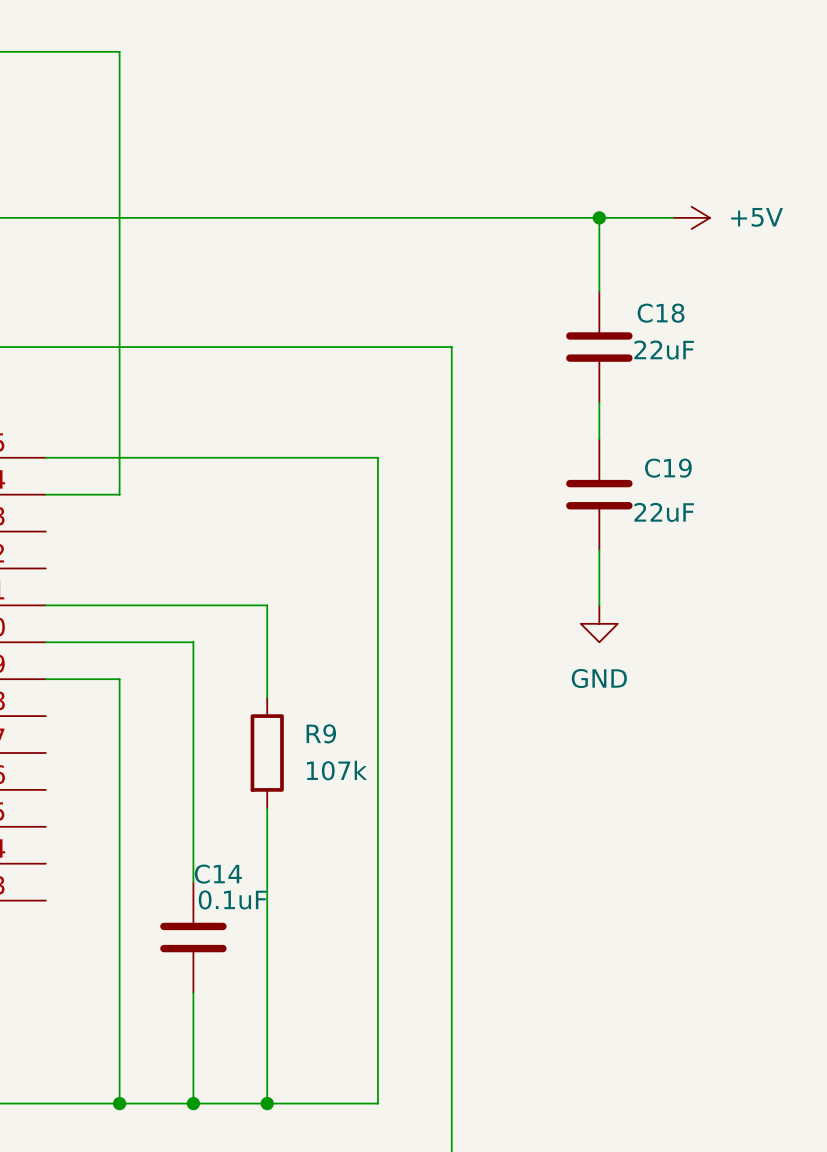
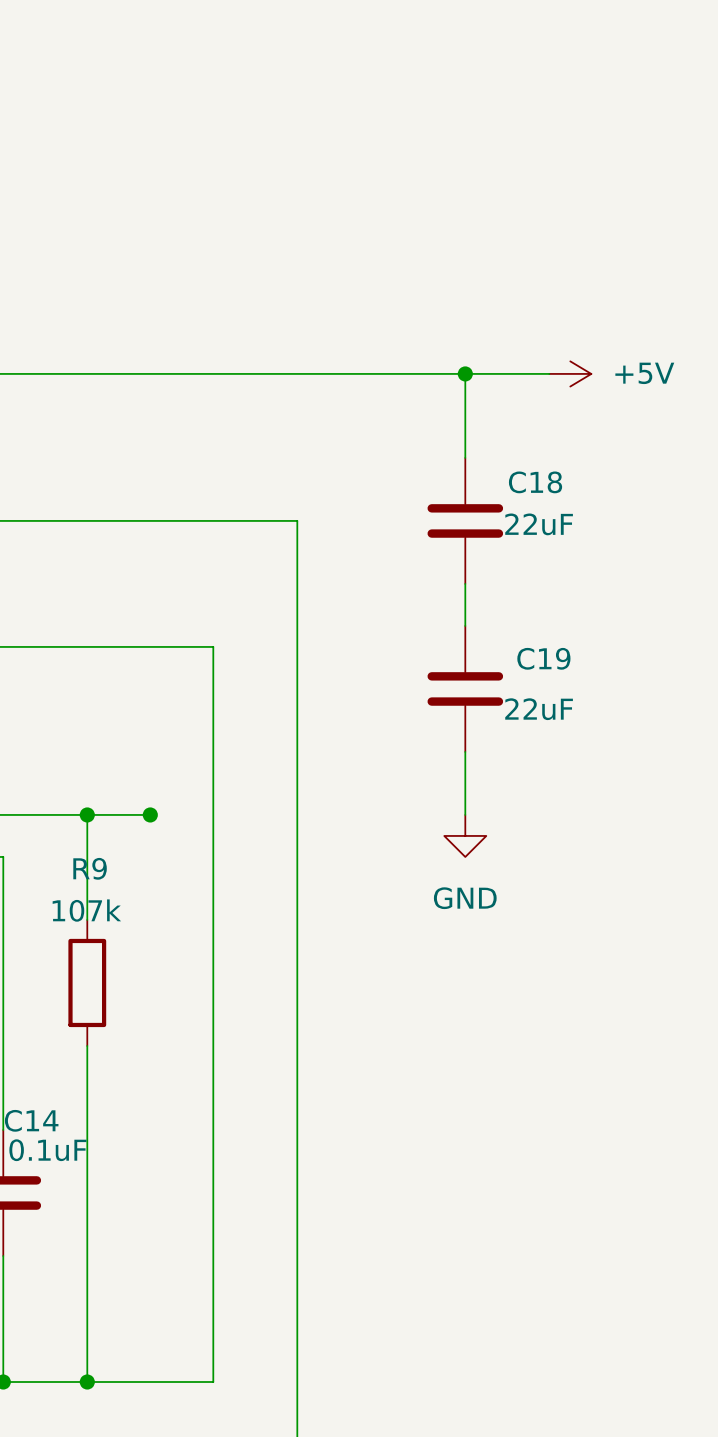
wire: none -> (87, 814) (150, 814)
junction: none -> (87, 814)
junction: none -> (150, 814)
R9 name position: R9 (321, 733) -> R9 (90, 868)
R9 value position: 107k (336, 770) -> 107k (86, 910)

